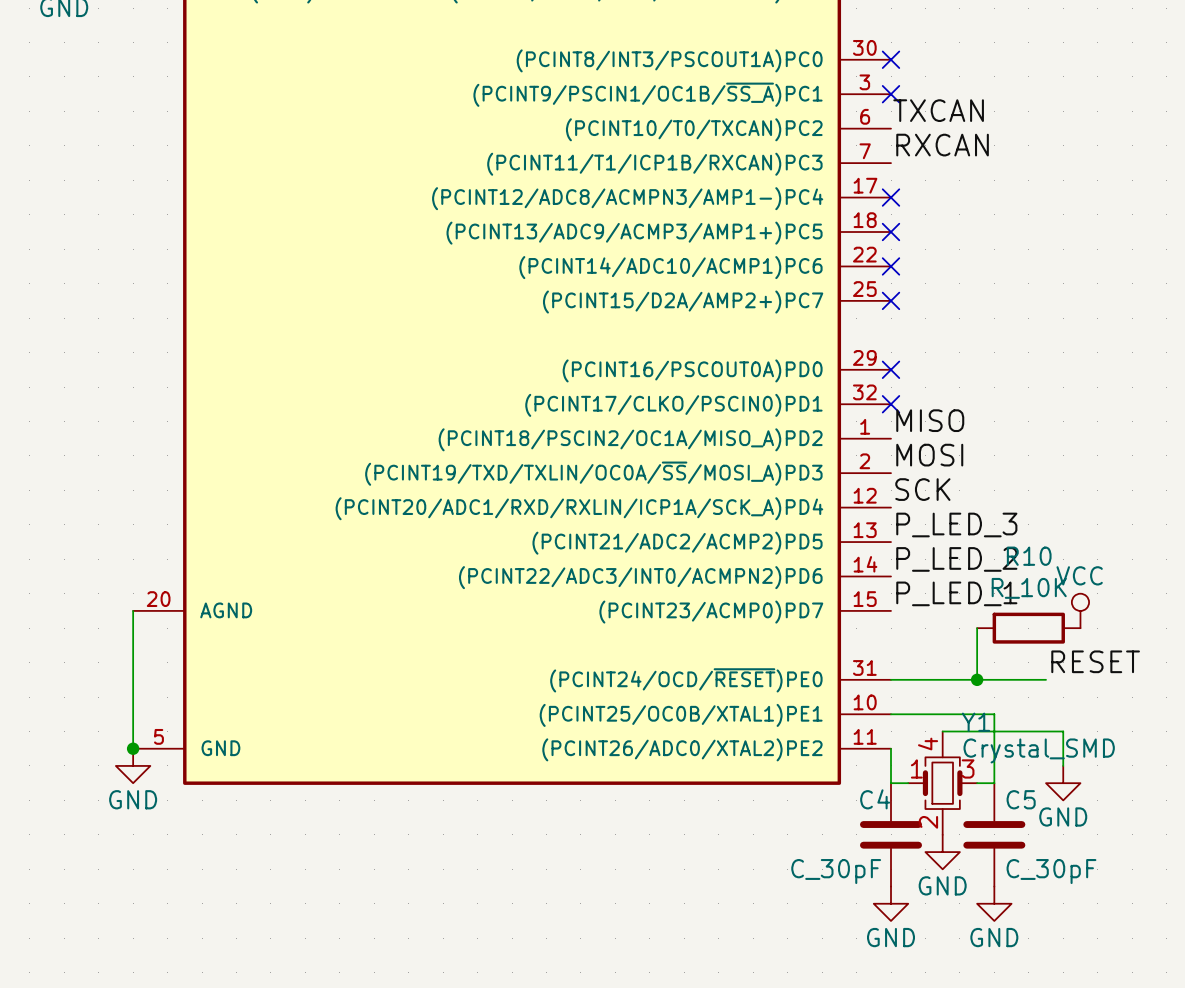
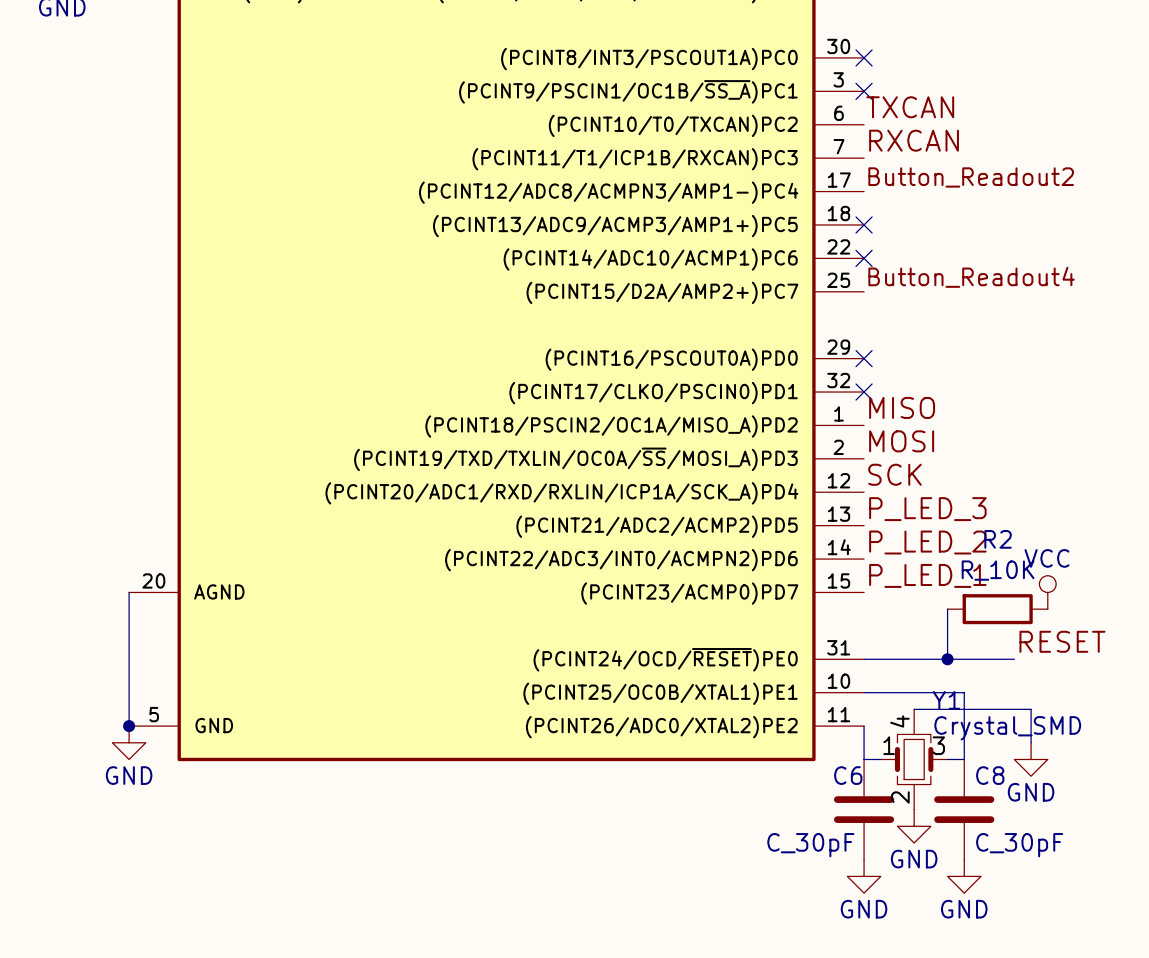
label: none -> Button_Readout2 (971, 177)
no-connect mark: (891, 197) -> none
label: none -> Button_Readout4 (971, 277)
no-connect mark: (891, 300) -> none
R10 name: R10 (1029, 556) -> R2 (998, 539)
C4 name: C4 (875, 799) -> C6 (848, 775)
C5 name: C5 (1021, 799) -> C8 (990, 775)

